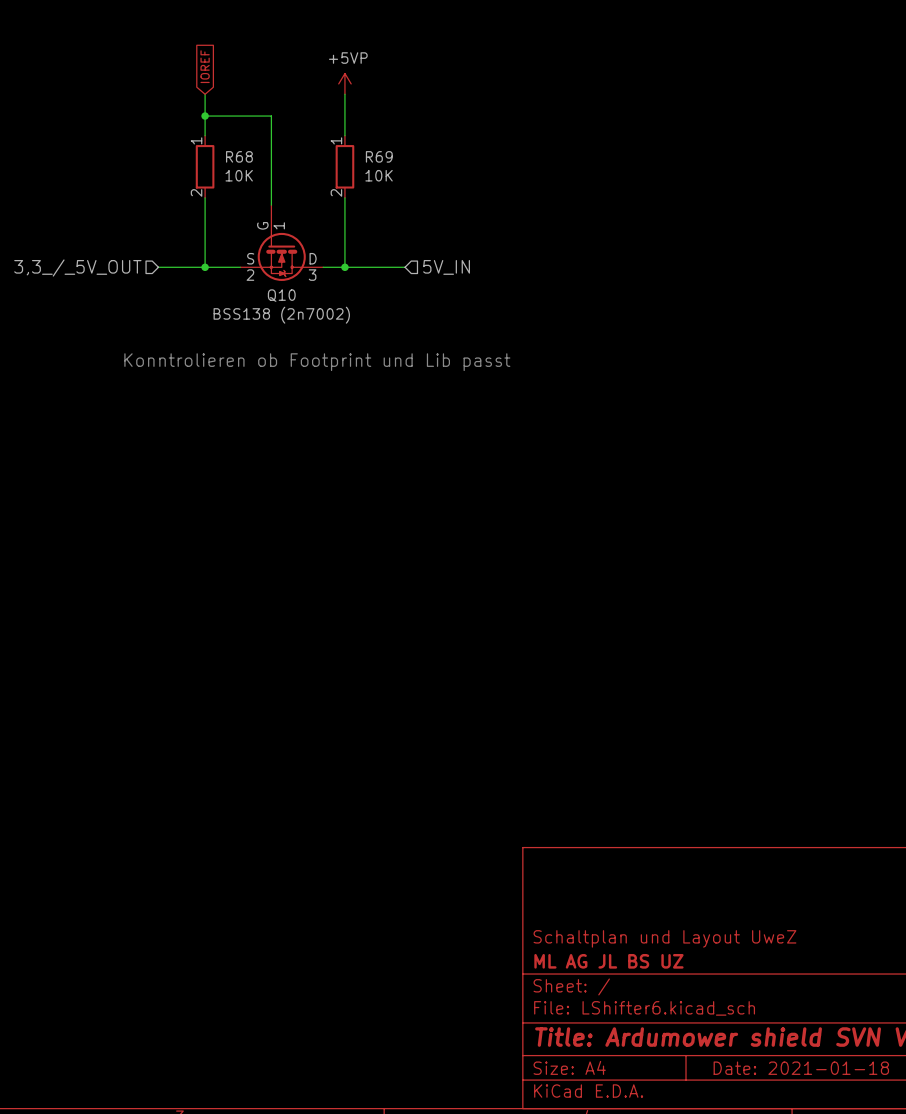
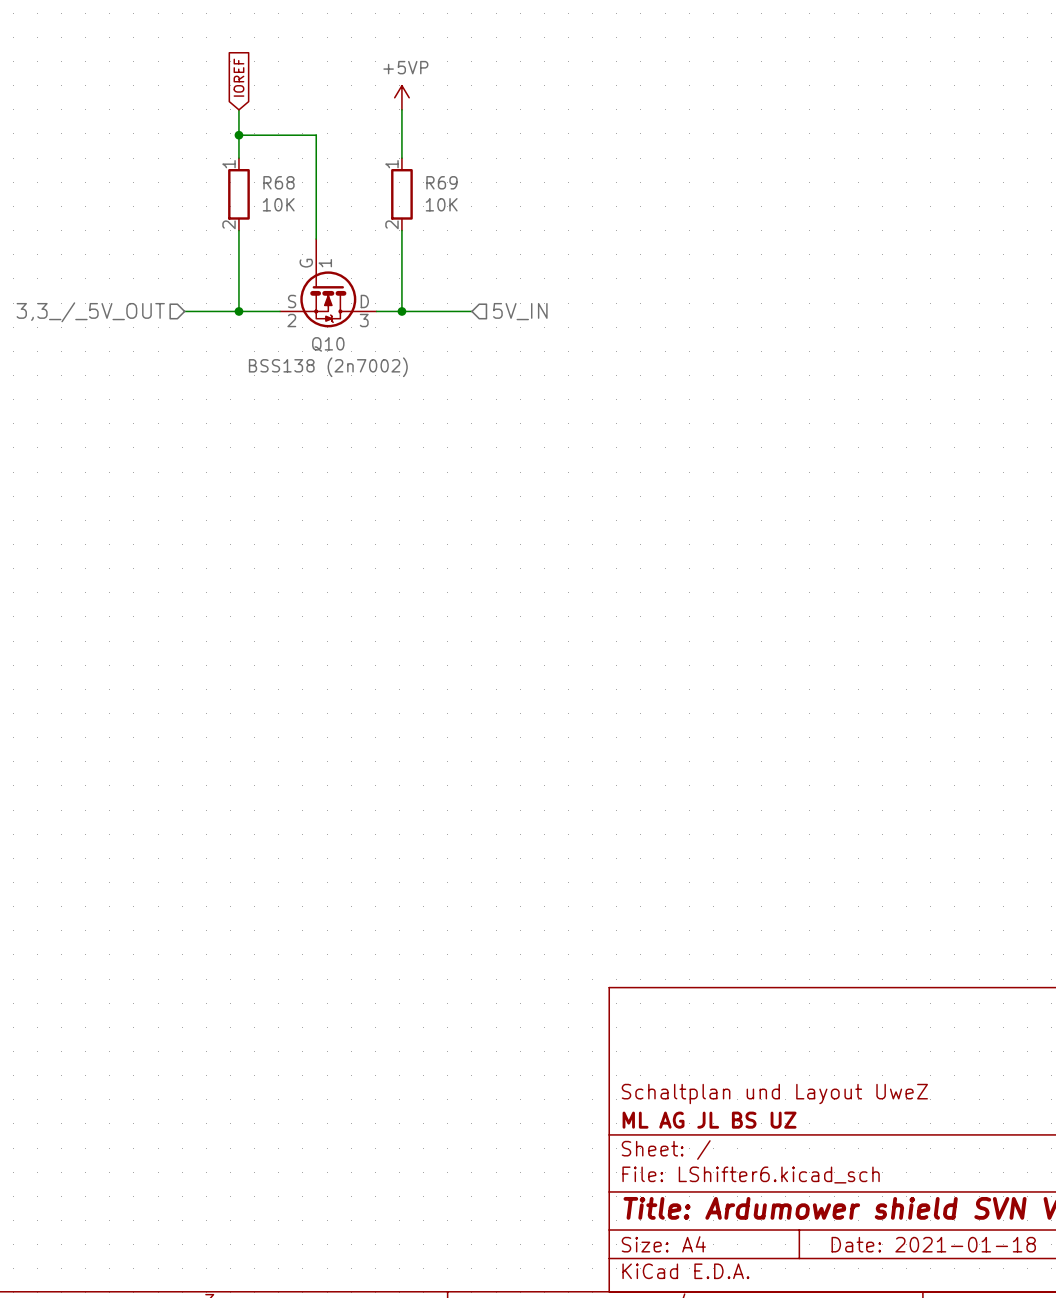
text: Konntrolieren ob Footprint und Lib passt (317, 362) -> none

